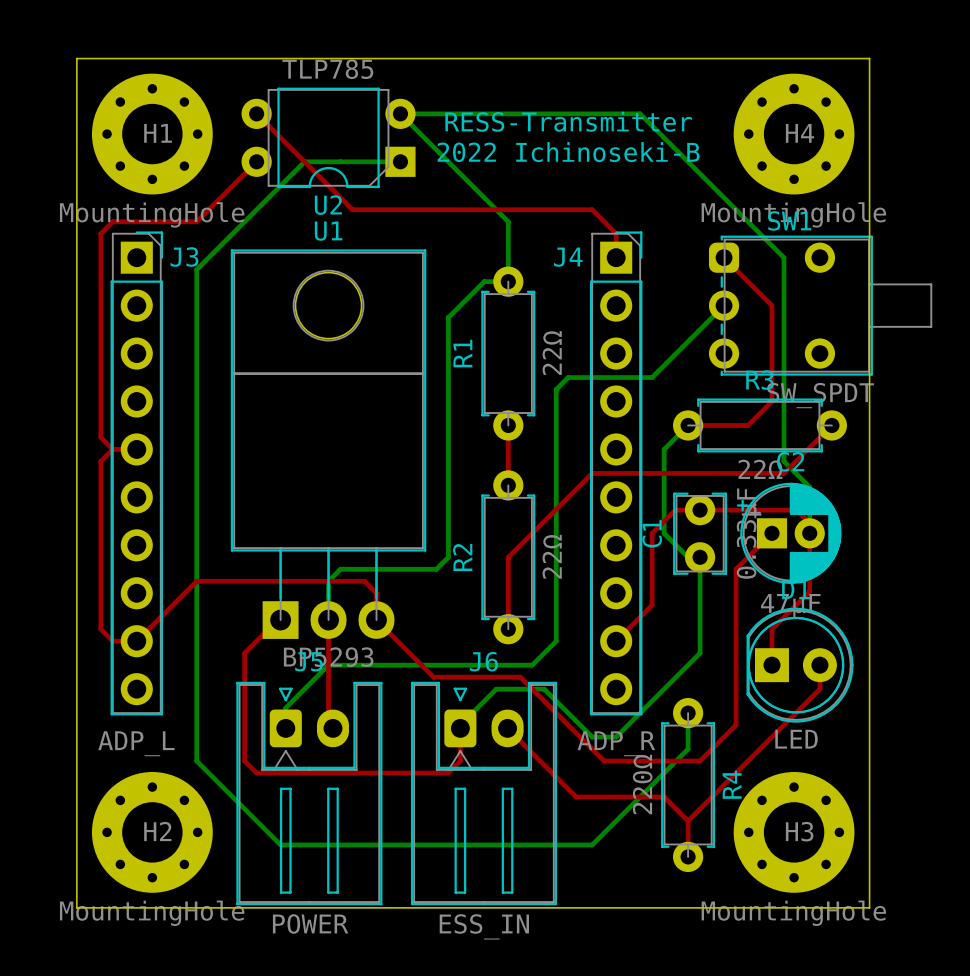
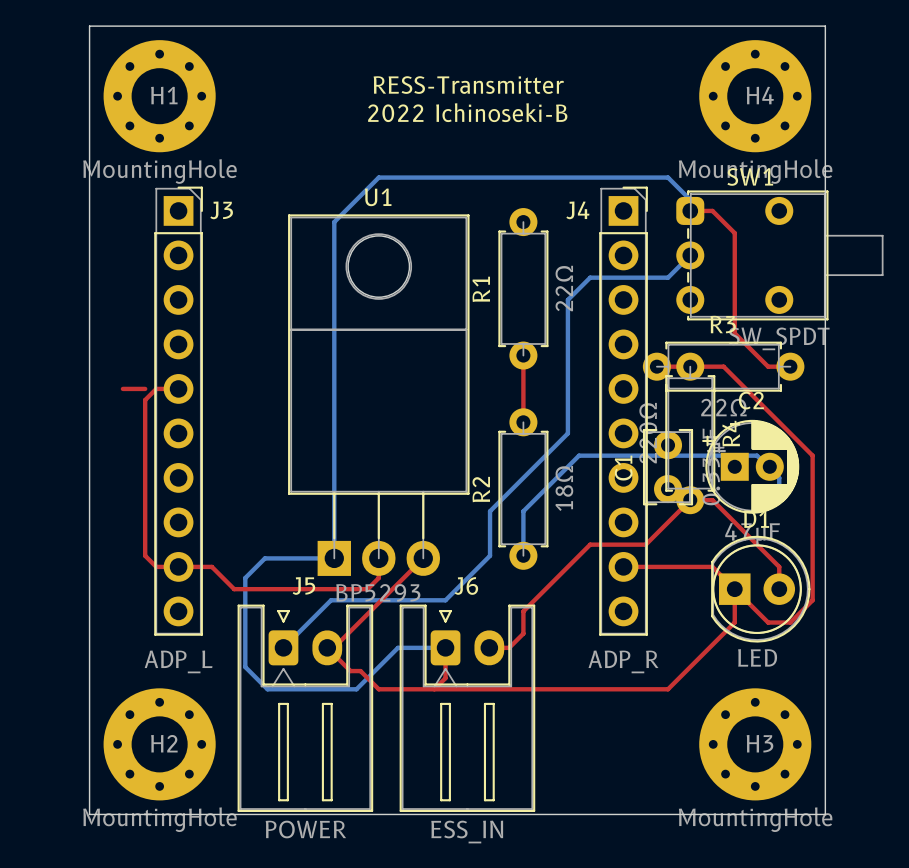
top track: (256, 113) (352, 209) (592, 209) (616, 233) (616, 257) -> none
text position: RESS-Transmitter (568, 121) -> RESS-Transmitter (468, 85)
U2: TLP785 (328, 137) -> none
text position: 2022 Ichinoseki-B (568, 152) -> 2022 Ichinoseki-B (467, 112)
top track: (256, 161) (196, 221) (112, 221) (100, 233) (100, 437) (112, 449) (100, 461) (100, 629) (112, 641) (136, 641) (196, 581) (364, 581) (376, 593) (376, 620) (433, 677) (520, 677) (604, 761) (700, 761) (736, 725) (736, 569) (771, 533) -> none
bottom track: (400, 161) (304, 161) (196, 269) (196, 761) (280, 844) (592, 844) (688, 749) (688, 713) -> none
top track: (724, 257) (771, 305) -> (690, 210) (712, 210) (734, 233) (734, 255)
bottom track: (700, 329) (652, 377) (568, 377) (556, 389) (556, 641) (532, 665) (328, 665) (285, 707) (285, 728) -> (668, 277) (590, 277) (567, 299) (567, 433) (490, 511) (490, 555) (445, 600) (331, 600) (283, 647)
R1 position: (508, 353) -> (523, 288)
top track: (771, 389) (771, 401) (748, 425) -> (734, 333) (768, 366) (779, 366)
top track: none -> (523, 355) (523, 422)
top track: (508, 425) (508, 485) -> none
bottom track: (688, 425) (664, 449) (664, 533) (688, 557) (700, 557) (700, 653) (616, 737) (592, 737) (544, 689) (496, 689) (460, 725) (460, 728) -> (690, 210) (690, 199) (668, 177) (378, 177) (334, 222) (334, 558) (264, 558) (245, 578) (245, 667) (267, 689) (356, 689) (397, 647) (445, 647)
top track: none -> (712, 366) (723, 366) (812, 455) (812, 600) (790, 622) (768, 622) (712, 566) (623, 566)
top track: (831, 425) (783, 473) (592, 473) (508, 557) (508, 629) -> none
U1 position: (328, 444) -> (378, 395)
top track: none -> (178, 388) (156, 388) (145, 400) (145, 555) (156, 566) (211, 566) (234, 589) (367, 589) (378, 578) (378, 558)
J3 position: (136, 473) -> (178, 411)
J4 position: (616, 473) -> (623, 411)
bottom track: (809, 533) (809, 487) (783, 461) (783, 257) (640, 113) (400, 113) (508, 221) (508, 281) (484, 281) (448, 317) (448, 557) (436, 569) (340, 569) (328, 581) (328, 620) -> none
R2 value: 22Ω (552, 556) -> 18Ω (564, 488)
R2 position: (508, 557) -> (523, 489)
bottom track: none -> (779, 500) (779, 477) (757, 455) (579, 455) (523, 511) (523, 555)
top track: (280, 620) (277, 620) (244, 653) (244, 761) (256, 773) (388, 773) -> (423, 558) (333, 647) (327, 647) (350, 671) (360, 671) (378, 689)
top track: (328, 620) (328, 723) (332, 728) -> none
top track: (616, 641) (652, 605) (652, 533) (675, 510) (796, 510) (809, 523) (809, 591) (771, 629) (771, 665) -> (434, 689) (668, 689) (734, 622) (734, 589)
top track: (819, 665) (819, 689) (688, 820) -> (779, 589) (779, 566) (712, 500) (690, 500) (645, 544) (590, 544) (523, 611) (523, 633) (509, 647) (489, 647)
top track: (507, 728) (576, 797) (664, 797) (688, 820) -> none
R4 position: (688, 785) -> (690, 433)
top track: (688, 820) (688, 856) -> none

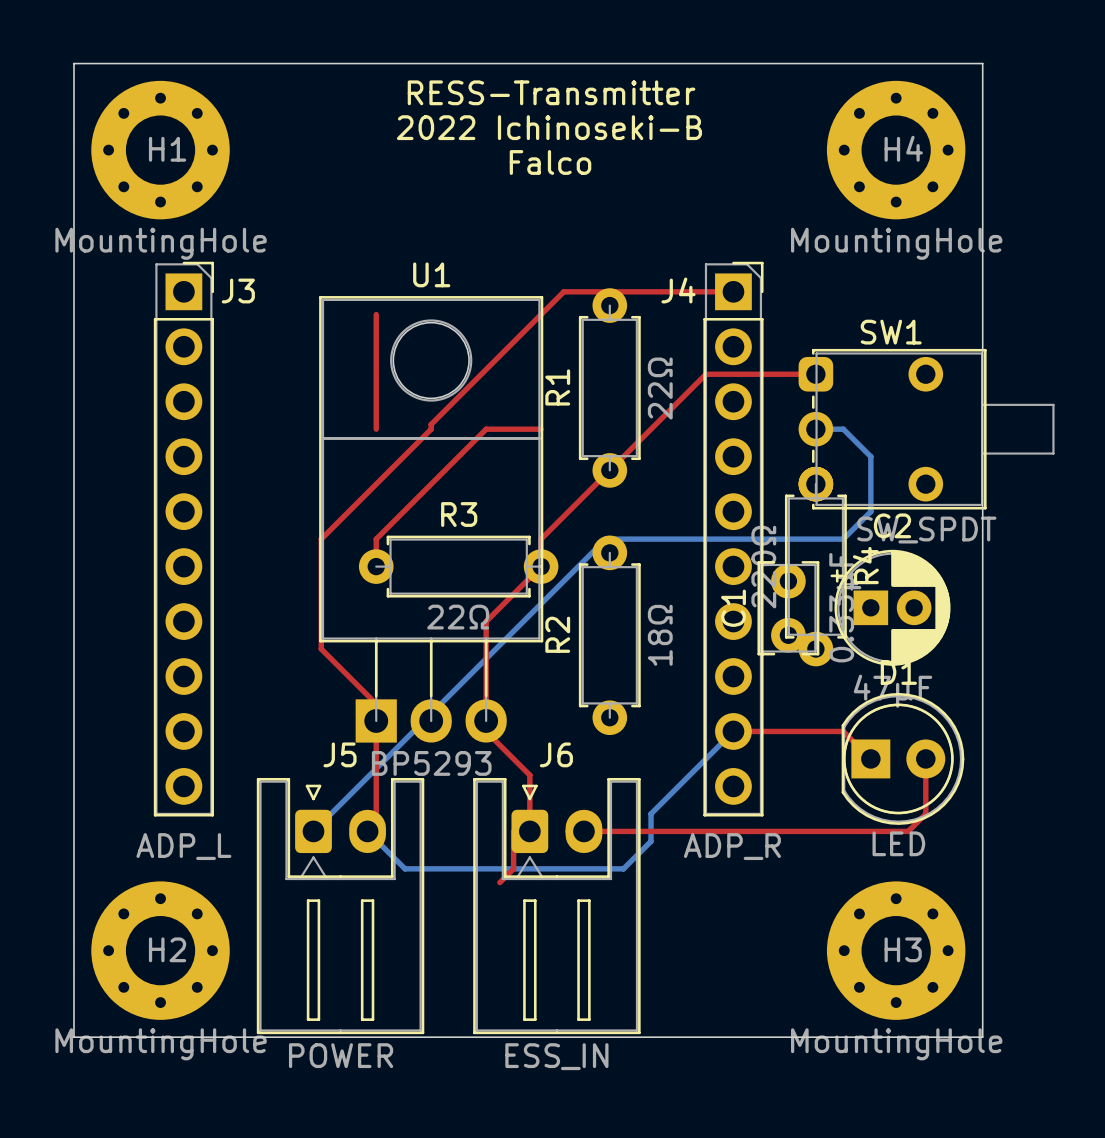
text position: RESS-Transmitter (468, 85) -> RESS-Transmitter (551, 92)
text: none -> Falco (550, 162)
text position: 2022 Ichinoseki-B (467, 112) -> 2022 Ichinoseki-B (549, 127)
top track: none -> (733, 291) (563, 291) (431, 424) (431, 429) (321, 539) (321, 649) (376, 703) (376, 822) (367, 831)
top track: (690, 210) (712, 210) (734, 233) (734, 333) (768, 366) (779, 366) -> none
bottom track: (690, 210) (690, 199) (668, 177) (378, 177) (334, 222) (334, 558) (264, 558) (245, 578) (245, 667) (267, 689) (356, 689) (397, 647) (445, 647) -> none
top track: none -> (376, 314) (376, 429)
bottom track: (690, 255) (668, 277) (590, 277) (567, 299) (567, 433) (490, 511) (490, 555) (445, 600) (331, 600) -> (815, 429) (843, 429) (870, 456) (870, 511) (843, 539) (605, 539) (372, 772)
SW1 position: (779, 255) -> (926, 429)
top track: none -> (815, 374) (705, 374) (541, 539) (541, 566) (486, 621) (486, 731) (529, 775) (529, 831)
top track: none -> (541, 429) (486, 429) (376, 539) (376, 566)
top track: (523, 355) (523, 422) -> none
top track: (656, 366) (723, 366) (812, 455) (812, 600) (790, 622) (768, 622) (734, 589) (734, 622) (668, 689) (378, 689) (360, 671) (350, 671) (327, 647) (333, 647) (423, 558) -> none
R3 position: (723, 366) -> (458, 566)
top track: (122, 388) (145, 388) -> none
top track: (178, 388) (156, 388) (145, 400) (145, 555) (156, 566) (211, 566) (234, 589) (367, 589) (378, 578) (378, 558) -> none
bottom track: (779, 500) (779, 477) (757, 455) (579, 455) (523, 511) (523, 555) -> none
bottom track: none -> (733, 731) (651, 813) (651, 841) (623, 868) (405, 868) (367, 831)
top track: (779, 589) (779, 566) (712, 500) (690, 500) (645, 544) (590, 544) (523, 611) (523, 633) (509, 647) -> (925, 758) (925, 813) (908, 831) (592, 831)
J6 position: (467, 708) -> (556, 906)

